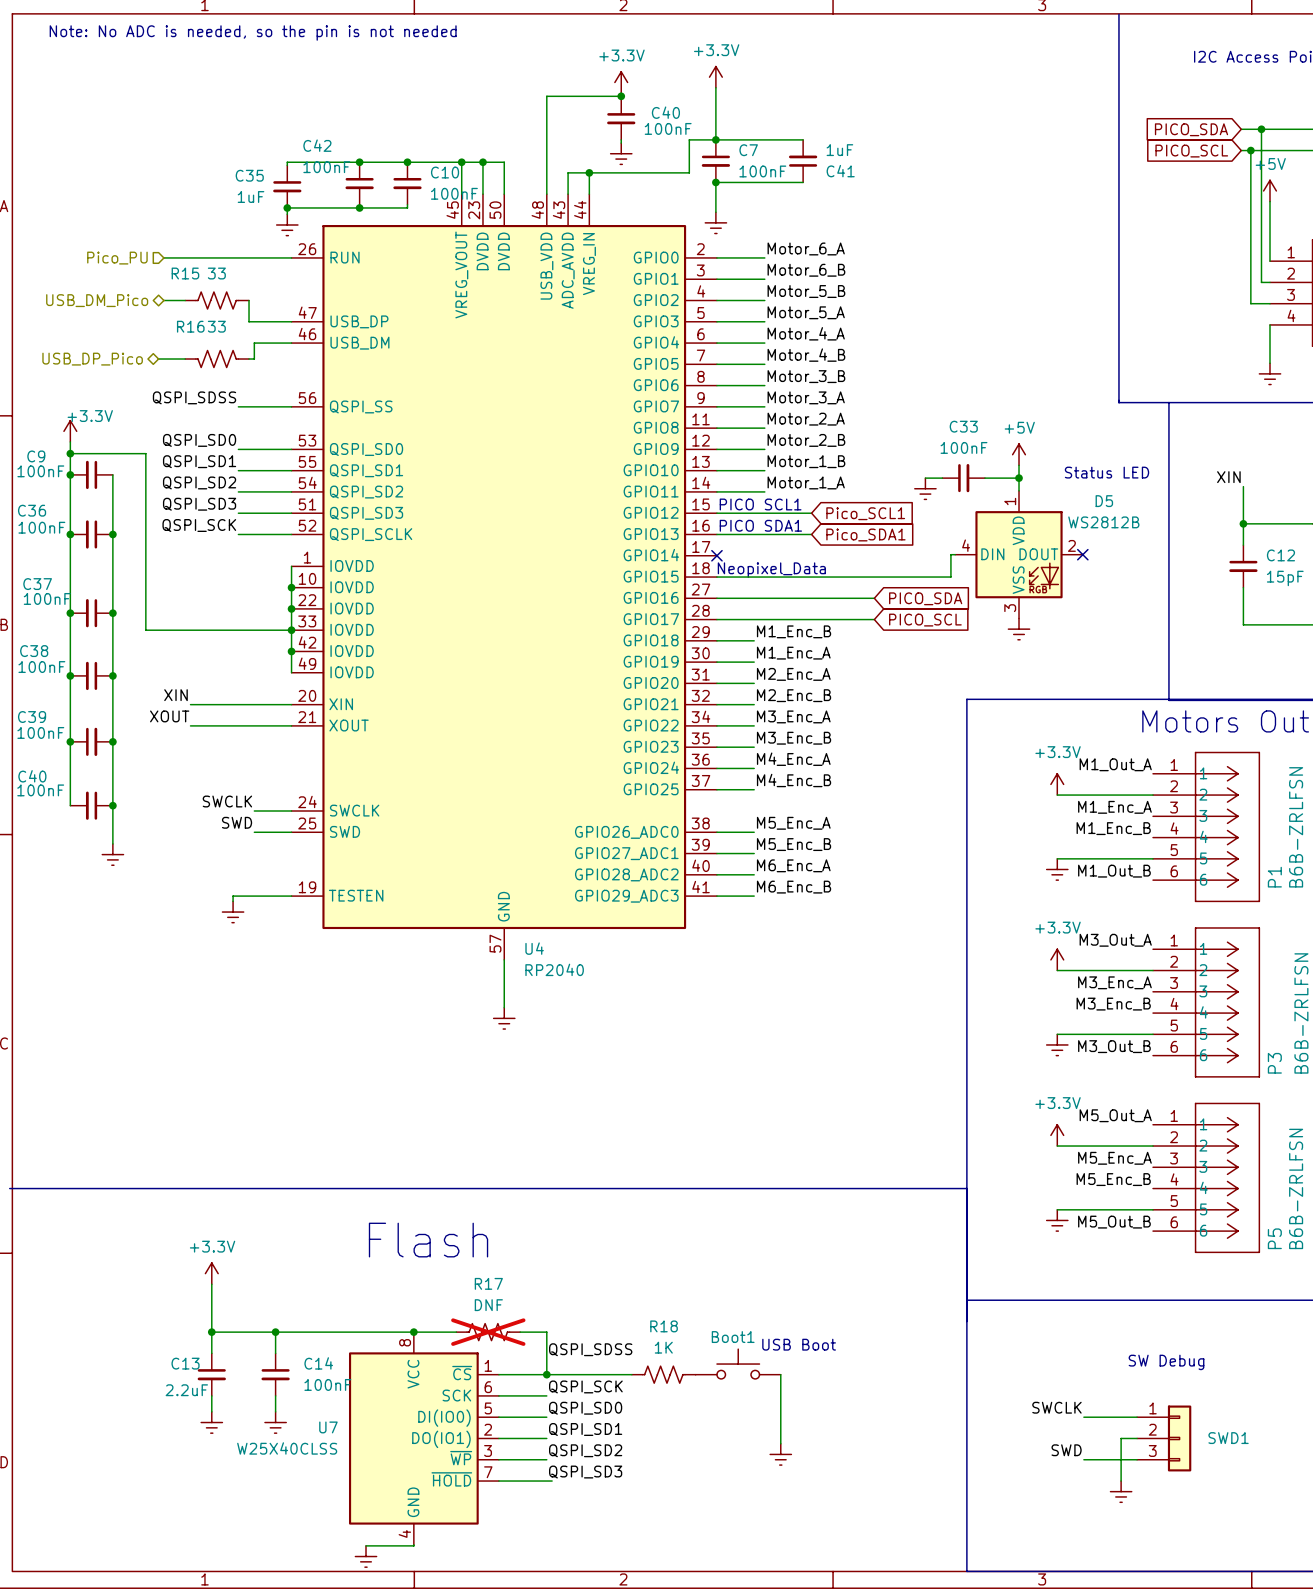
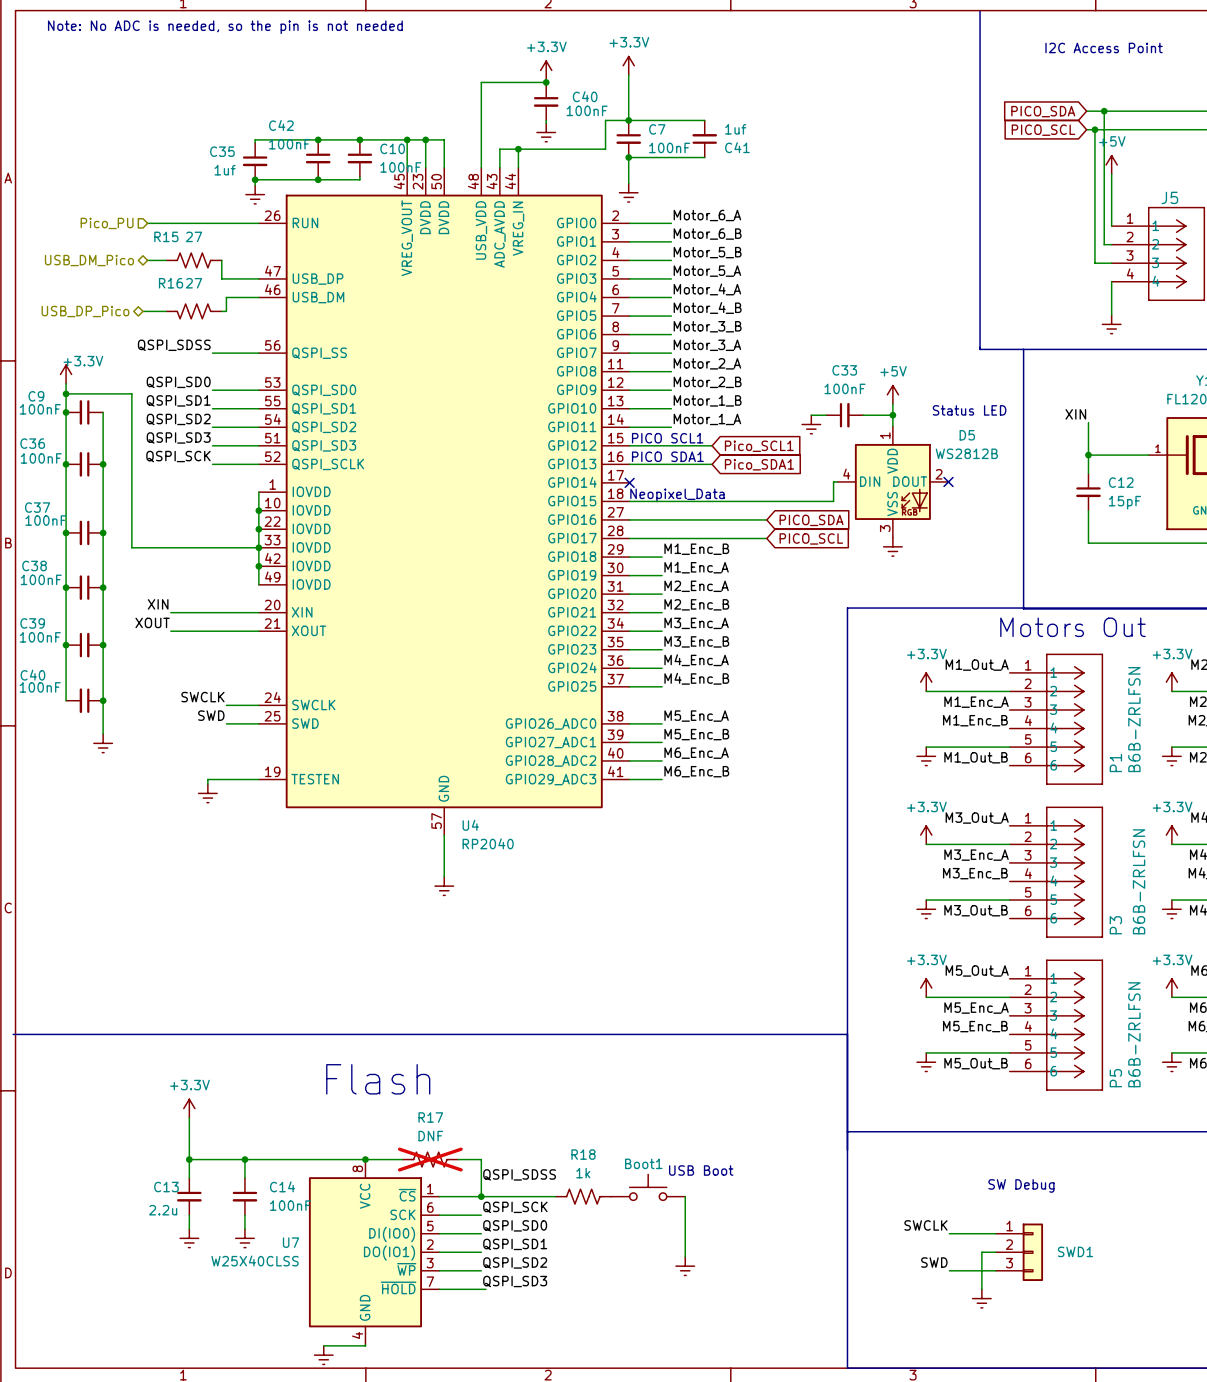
C41 value: 1uF (839, 150) -> 1uf (735, 129)
C35 value: 1uF (251, 197) -> 1uf (225, 170)
R15 value: 33 (216, 273) -> 27 (193, 236)
R16 value: 33 (216, 326) -> 27 (193, 283)
R18 value: 1K (663, 1347) -> 1k (583, 1173)
C13 value: 2.2uF (186, 1390) -> 2.2u (163, 1210)

